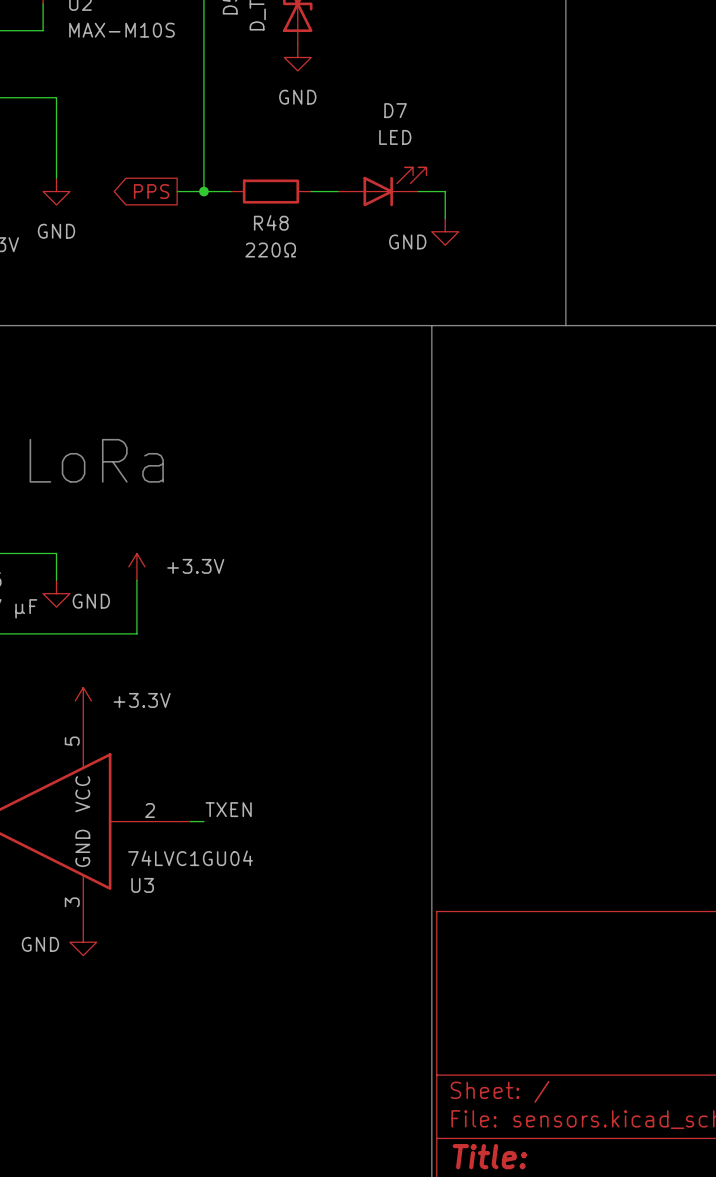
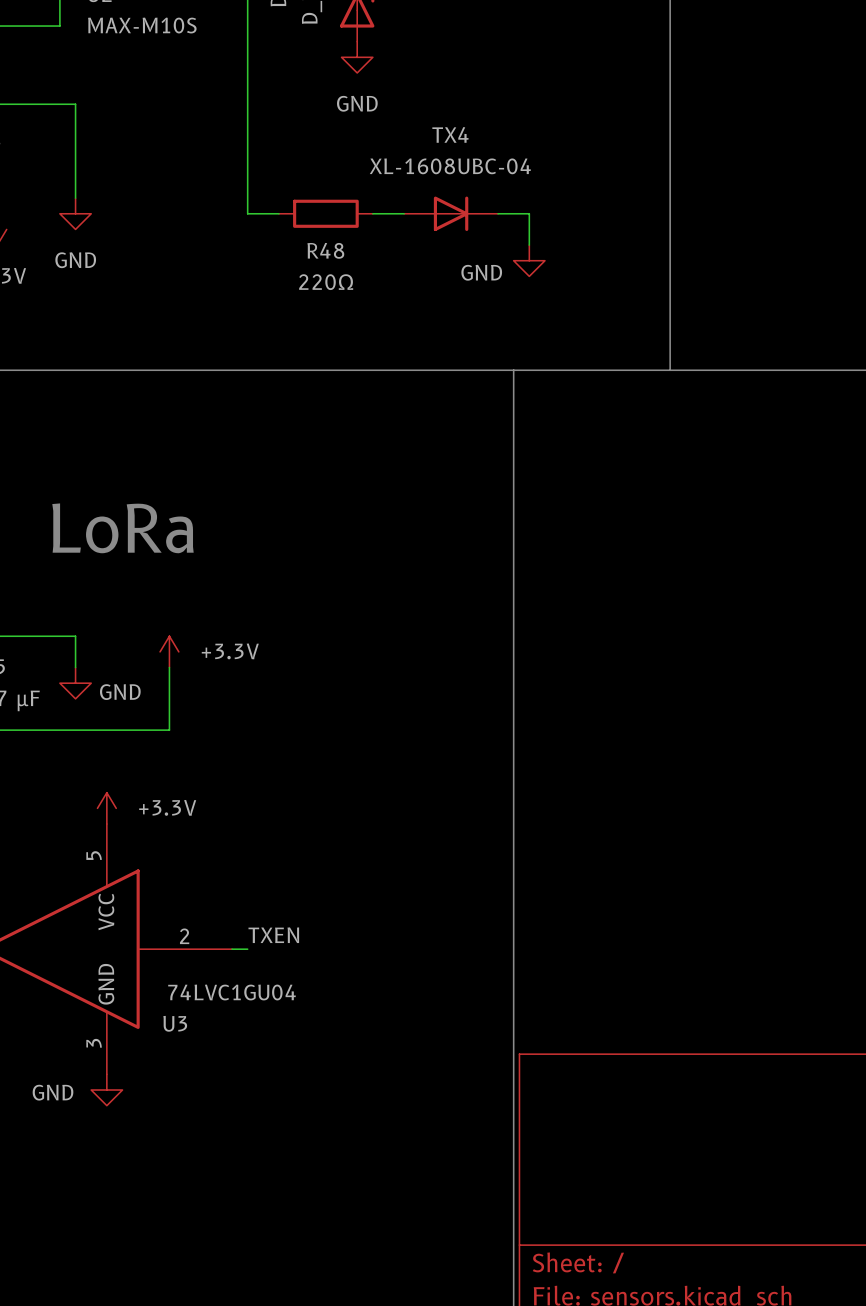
D7: LED (382, 186) -> none
global label: PPS (151, 191) -> none
wire: (177, 191) (203, 191) -> none
junction: (203, 191) -> none
TX4: none -> XL-1608UBC-04 (451, 213)

